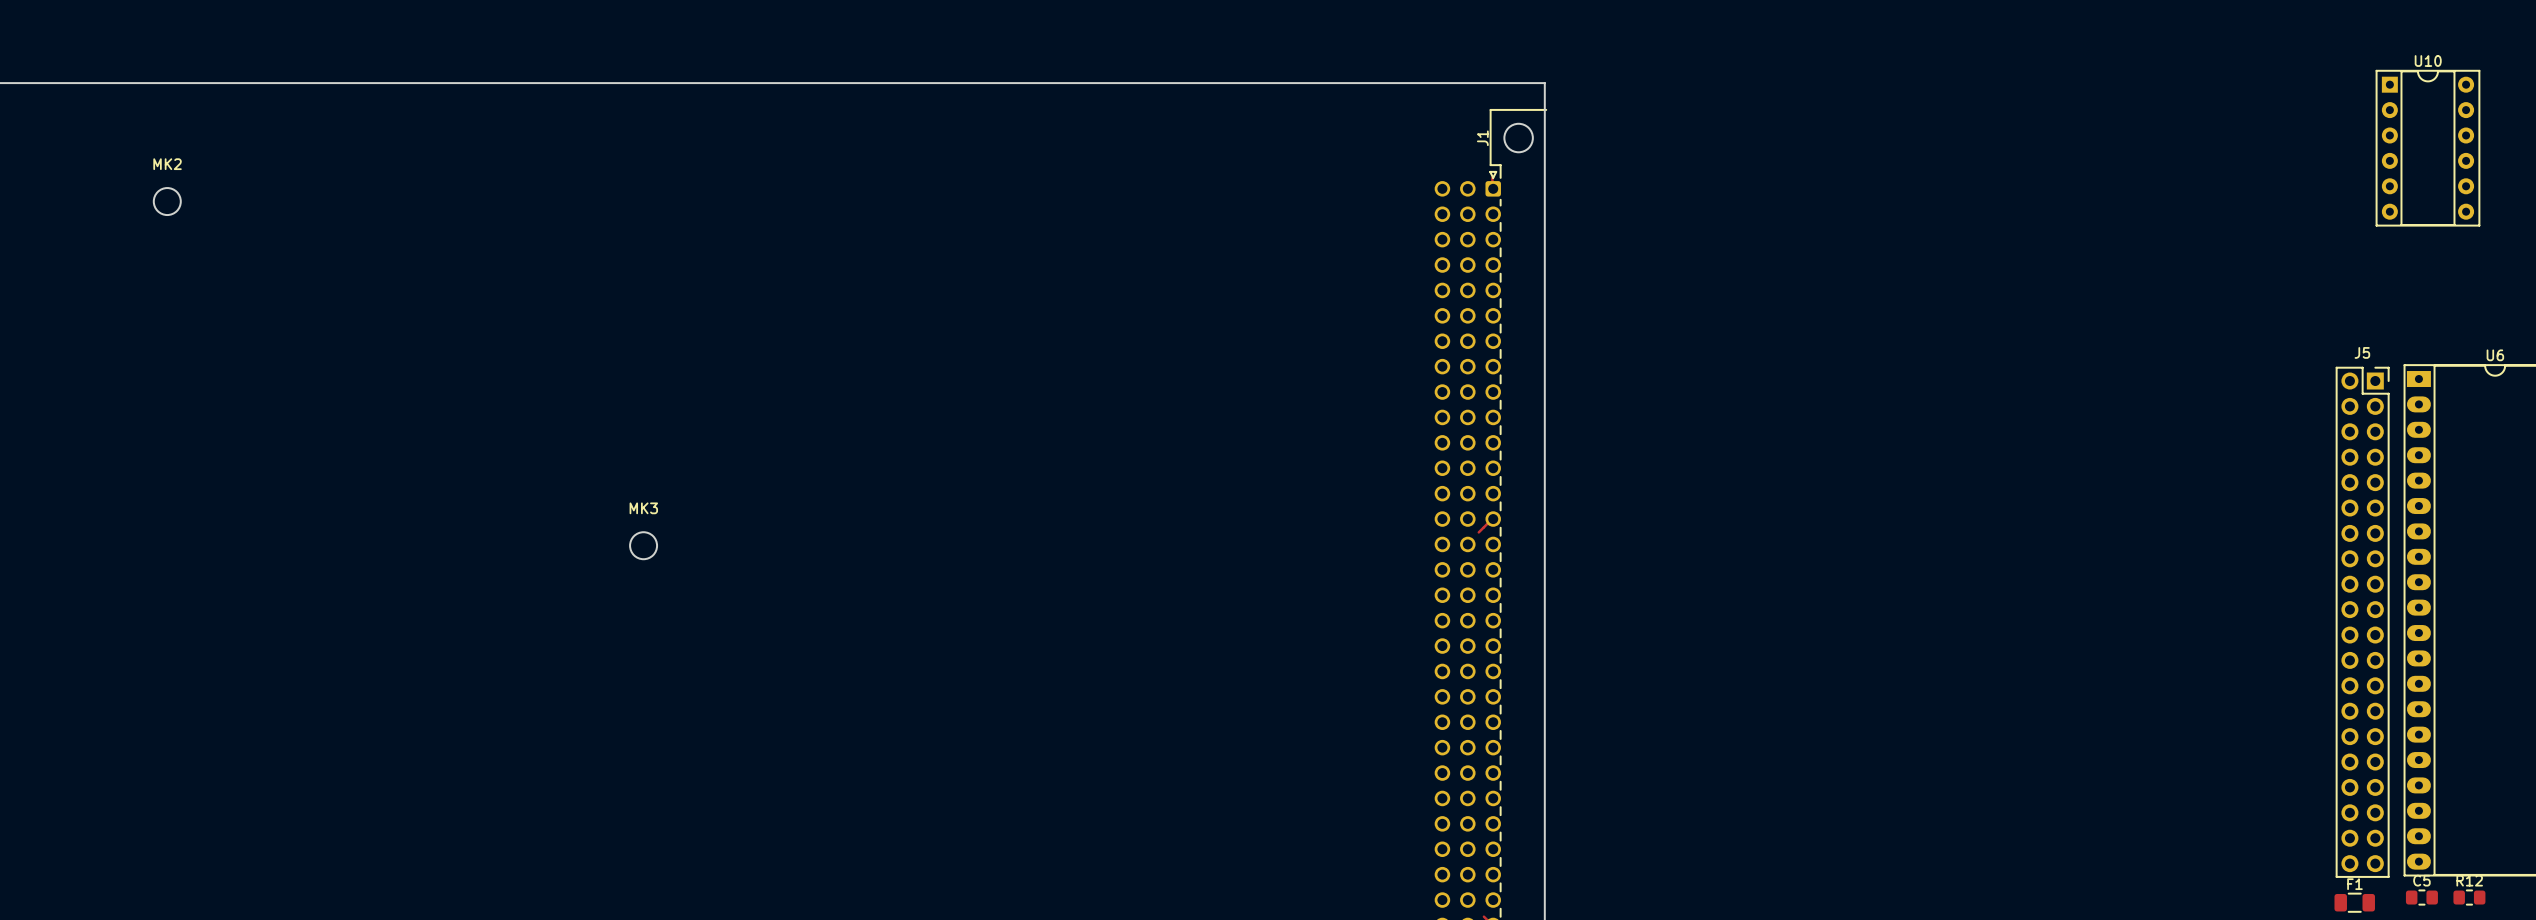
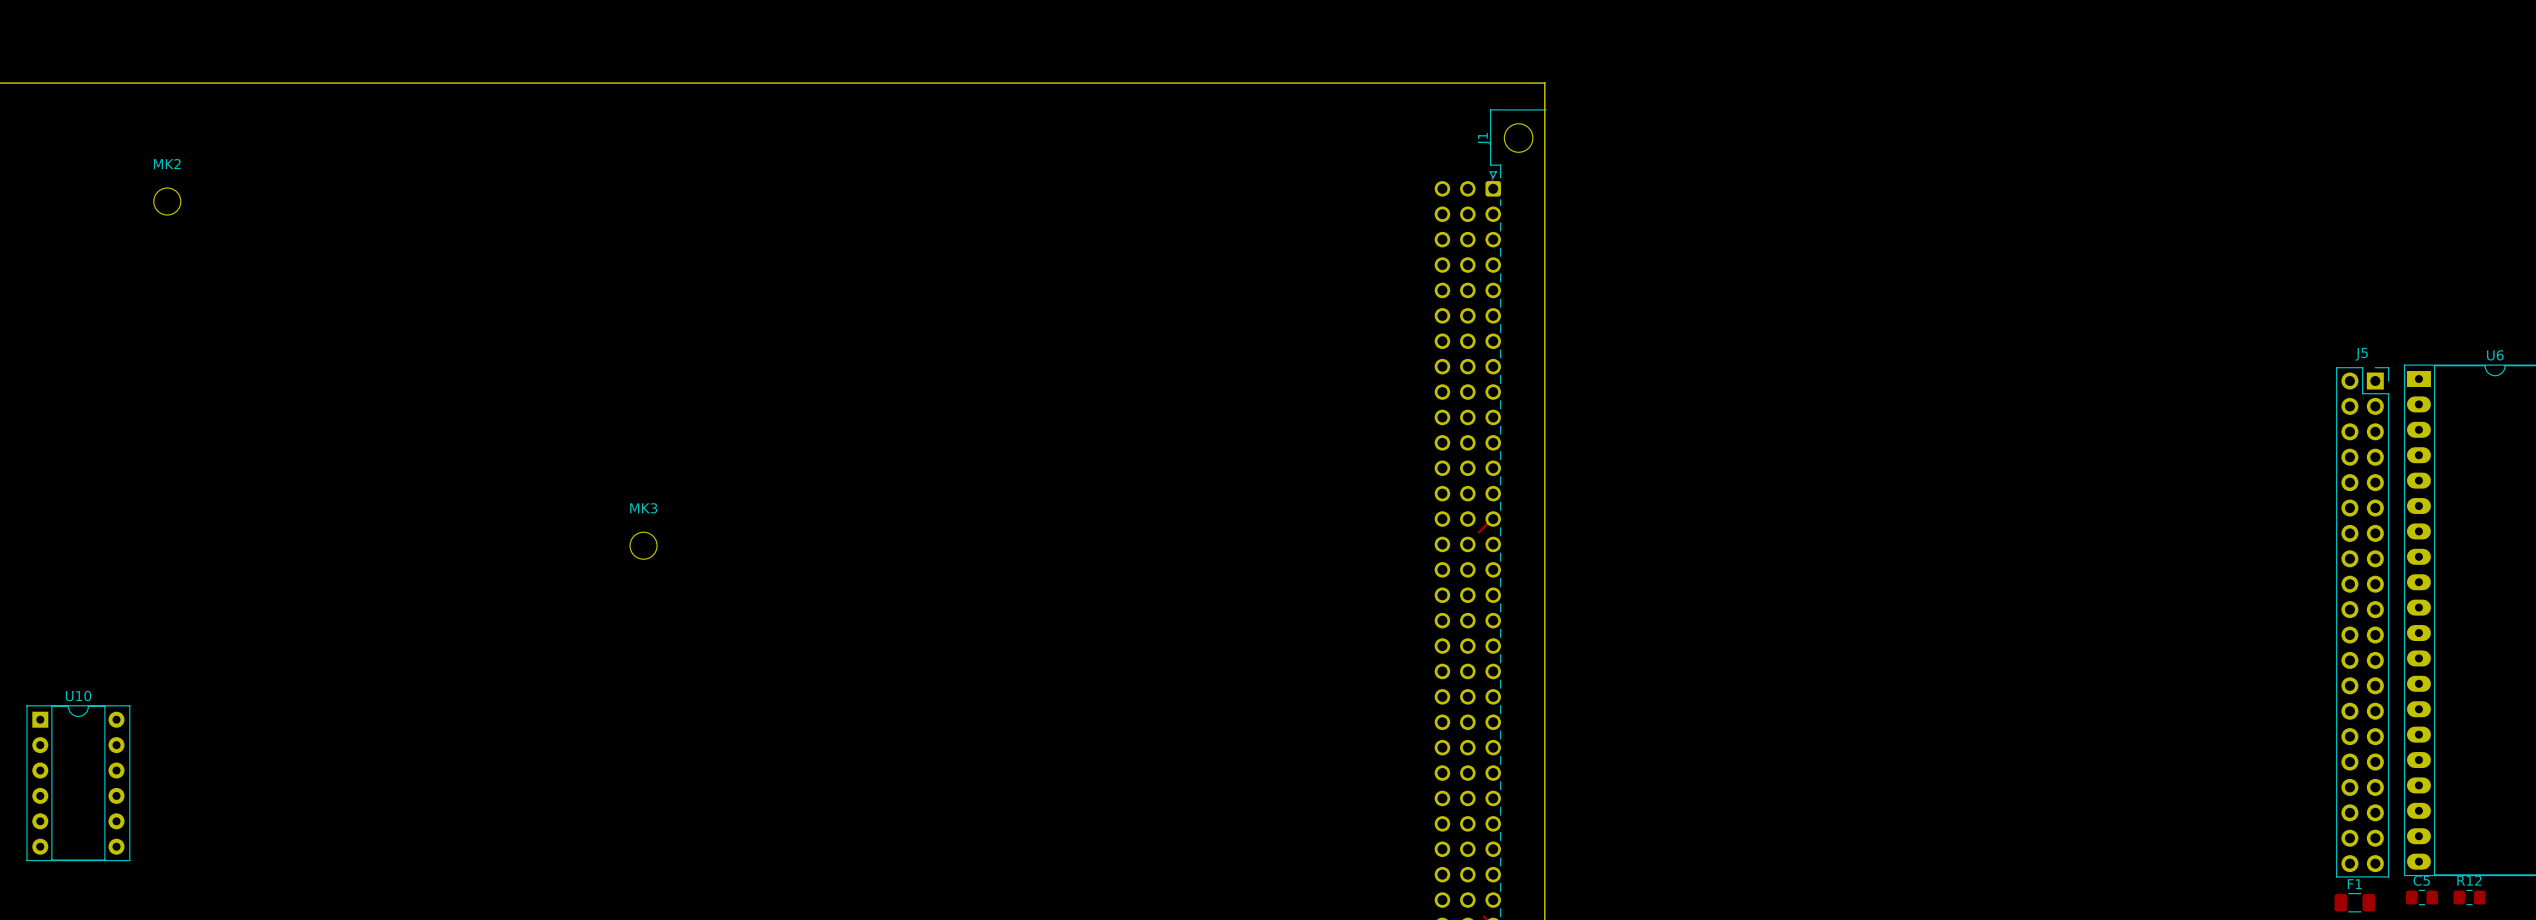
U10 position: (2427, 148) -> (78, 783)

